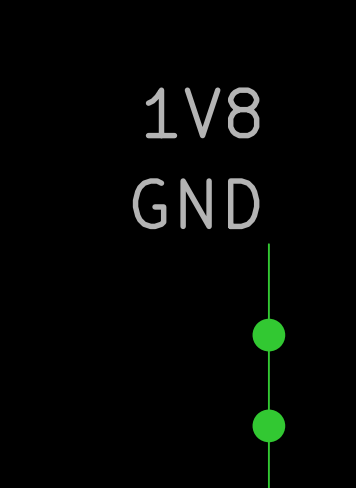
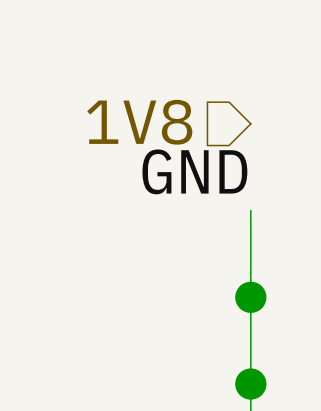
label: 1V8 (202, 112) -> none
hierarchical label: none -> 1V8 (139, 122)

